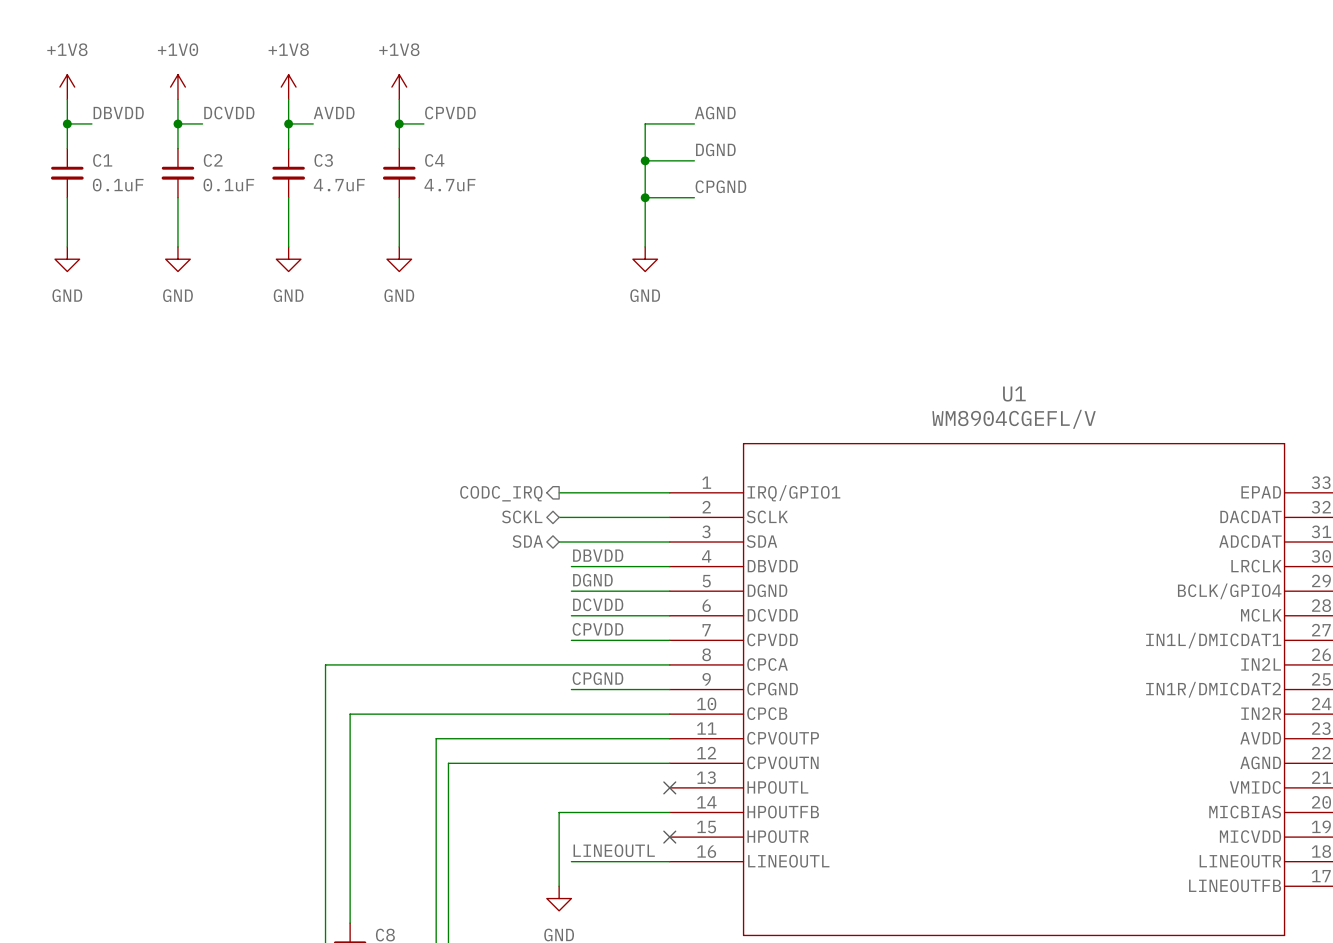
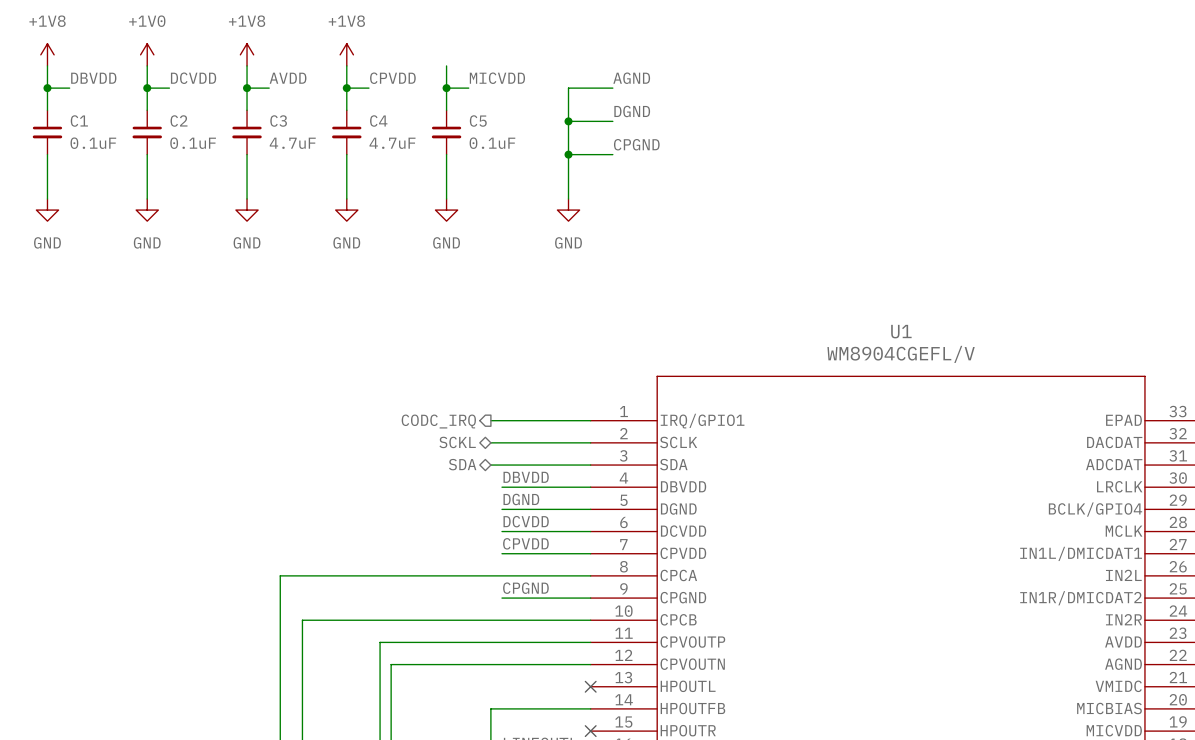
wire: none -> (446, 65) (446, 110)
label: none -> MICVDD (497, 78)
wire: none -> (446, 88) (468, 88)
junction: none -> (446, 88)
C5: none -> 0.1uF (446, 132)
wire: none -> (446, 154) (446, 198)
power symbol: none -> GND (446, 210)

